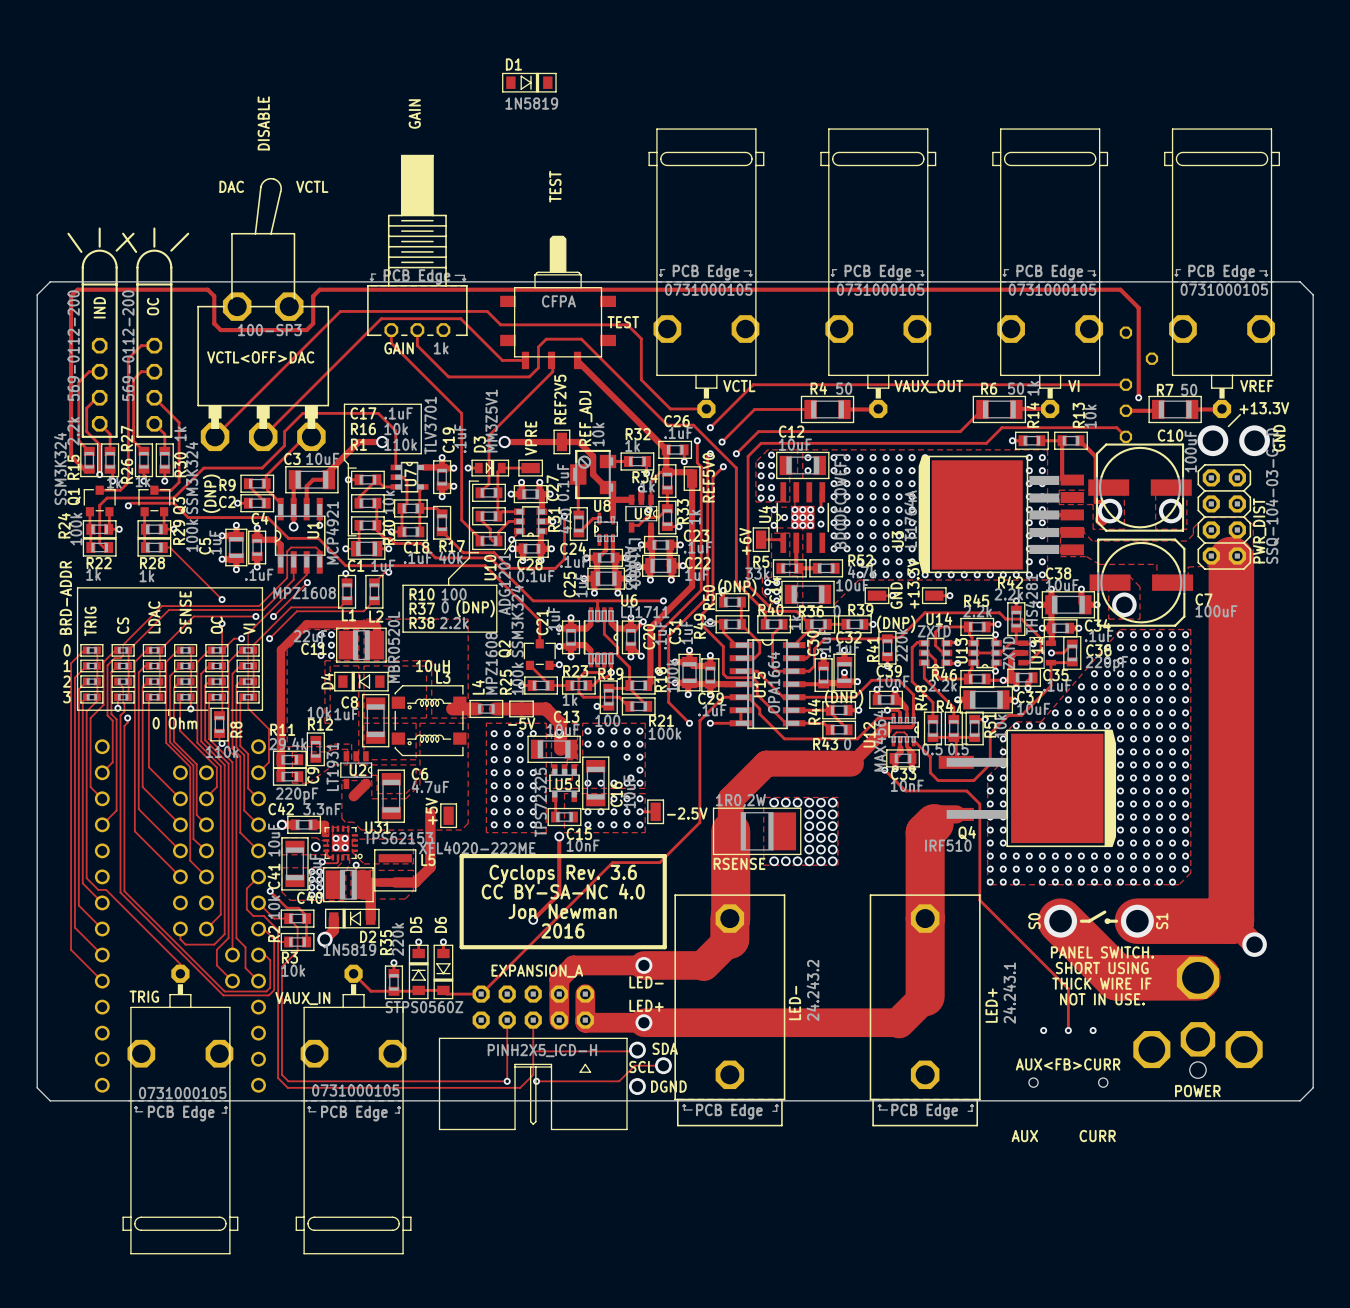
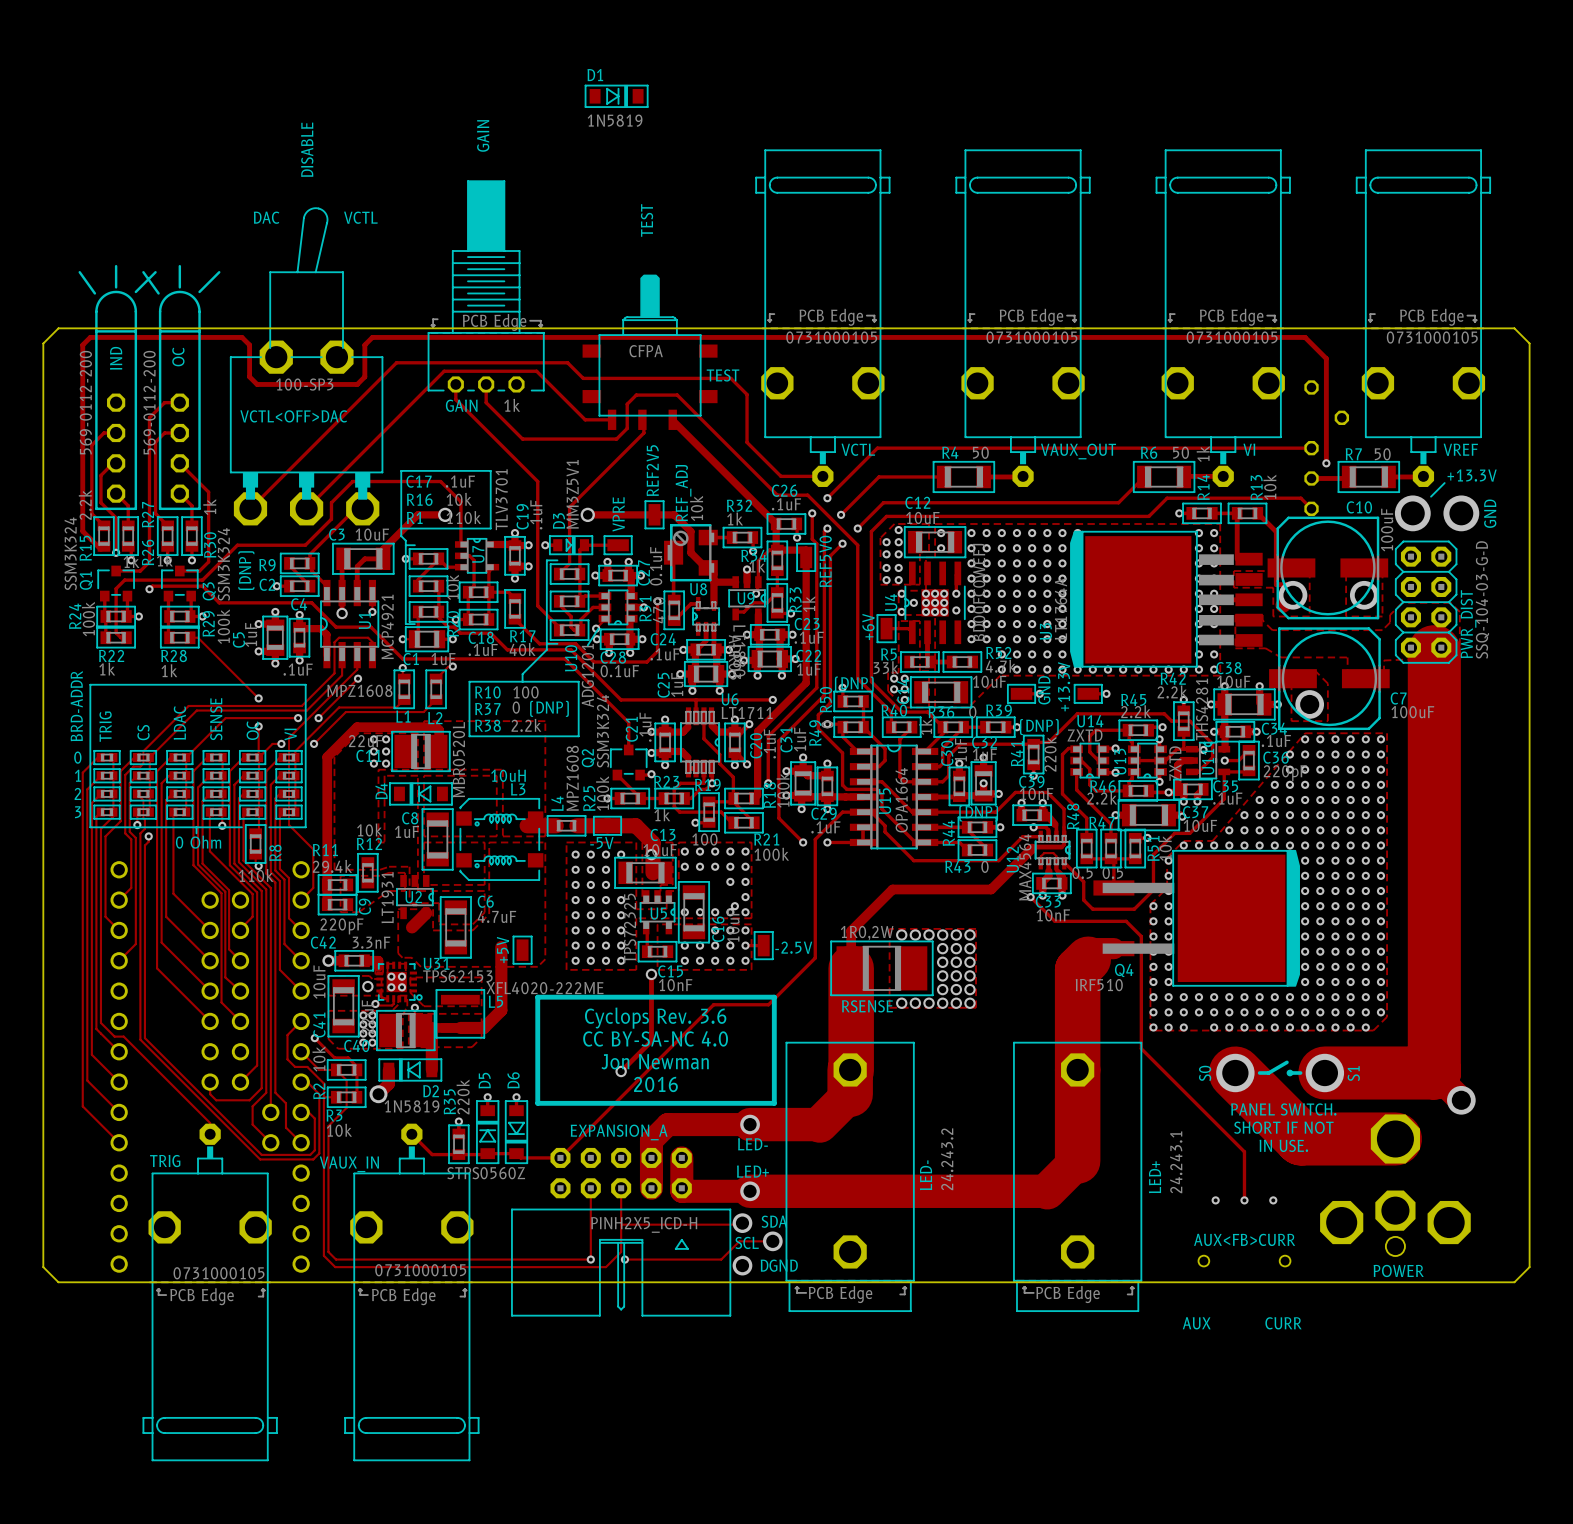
track width: thick (885, 729) (850, 763) (766, 763) (730, 799) (730, 831) -> thin (1031, 849) (991, 889) (892, 889) (851, 930) (851, 968)
text: SHORT USING (1102, 968) -> SHORT IF NOT (1283, 1127)
text: THICK WIRE IF (1102, 983) -> IN USE. (1283, 1145)
text: NOT IN USE. (1102, 999) -> none

